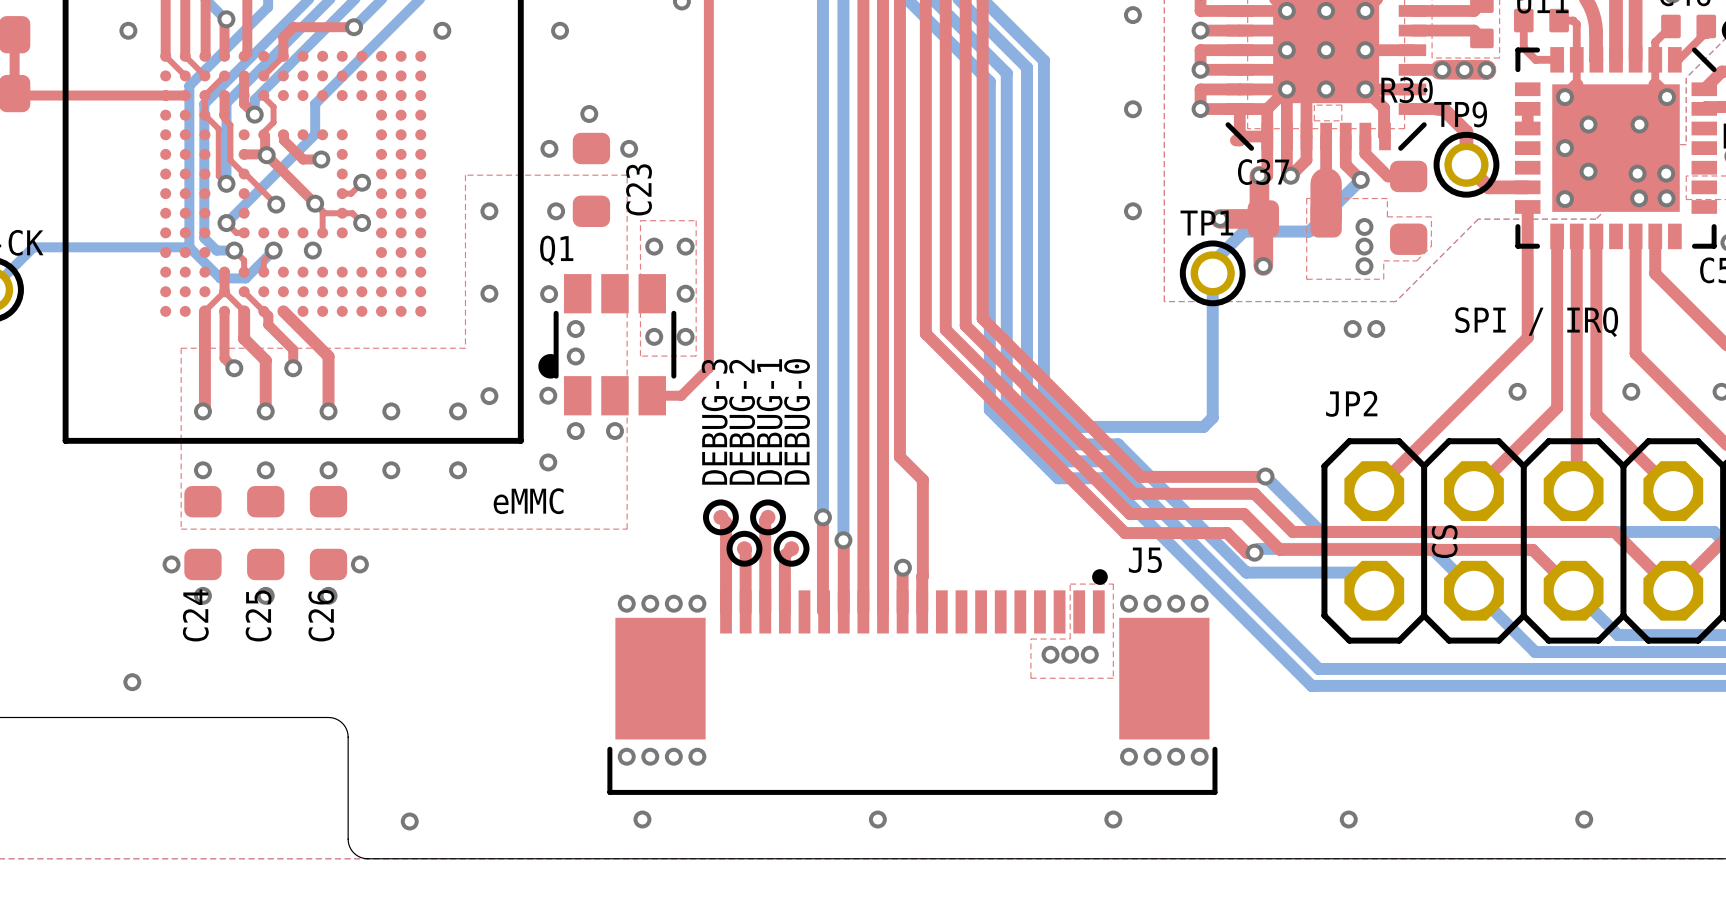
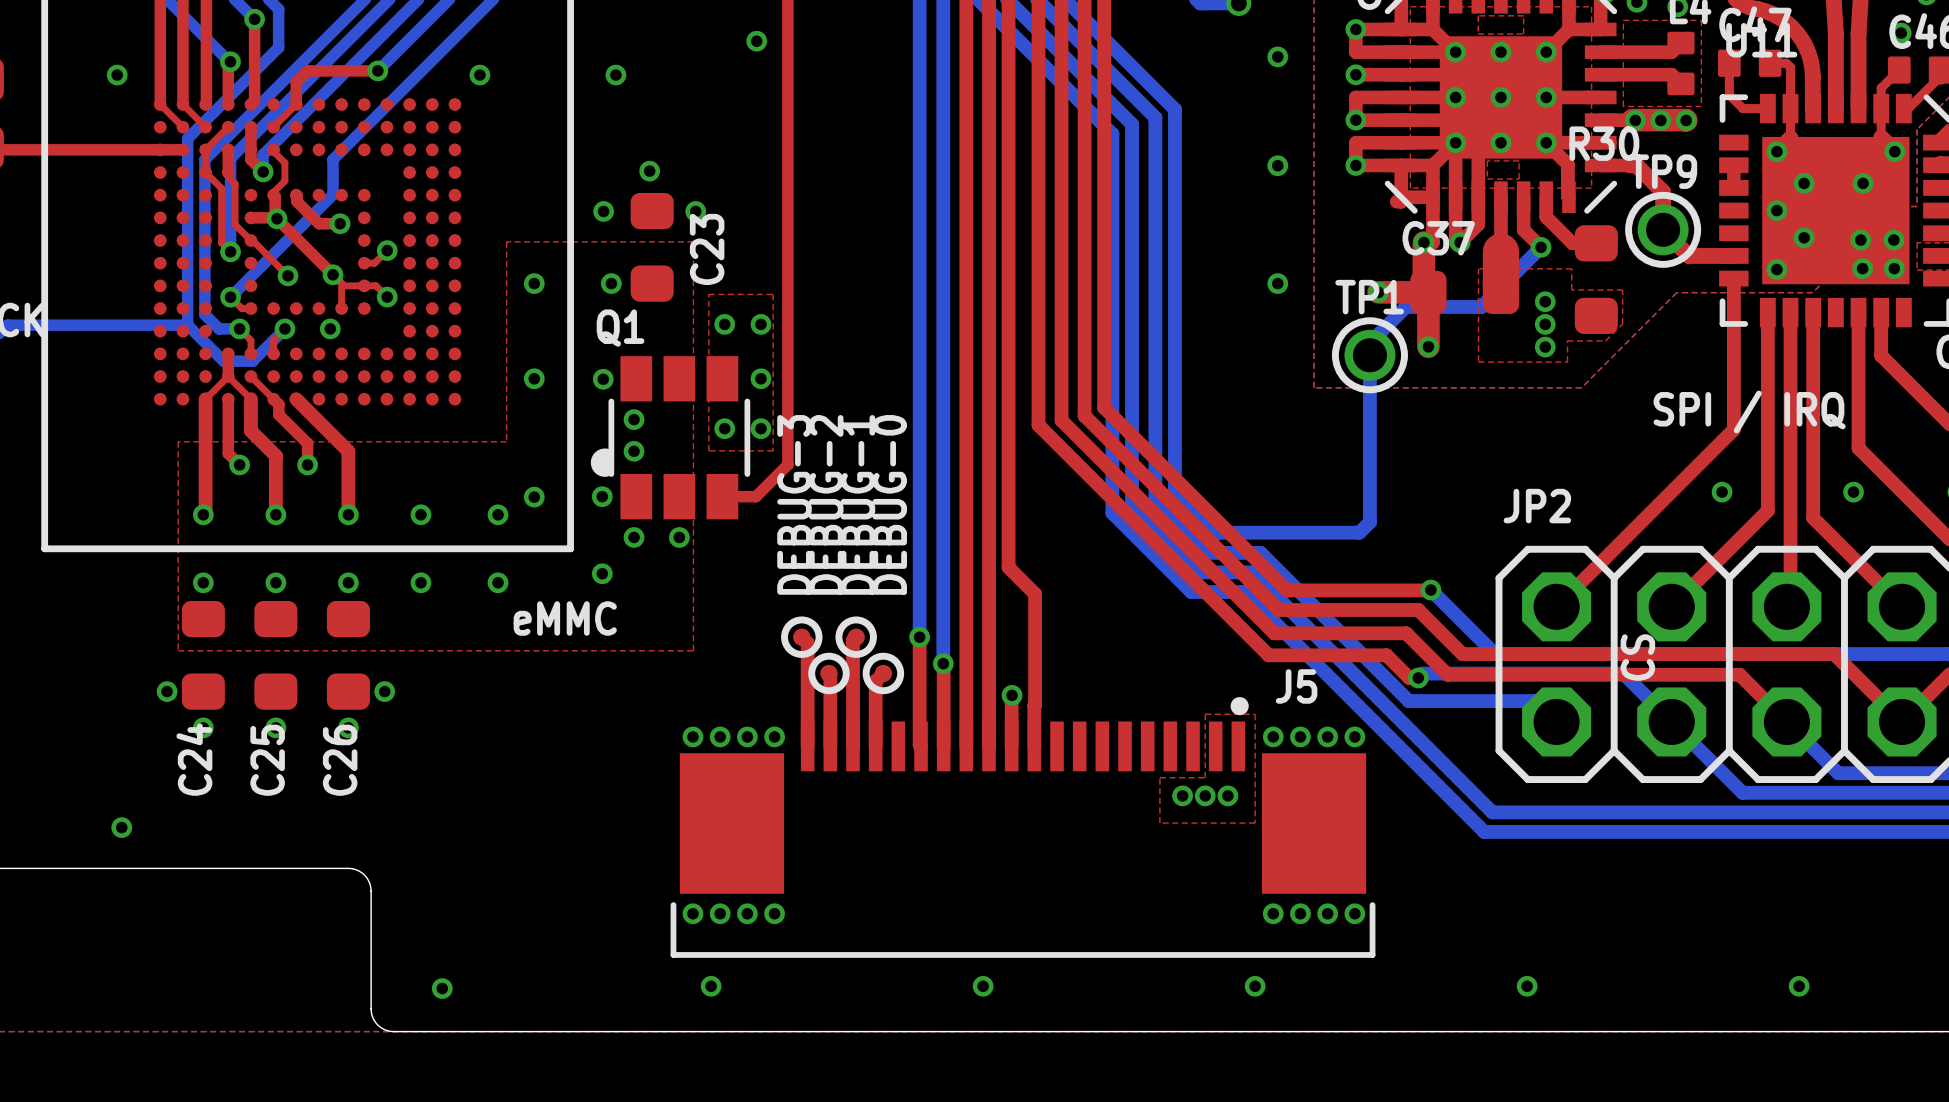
via: (1352, 329) -> none
via: (1376, 329) -> none

